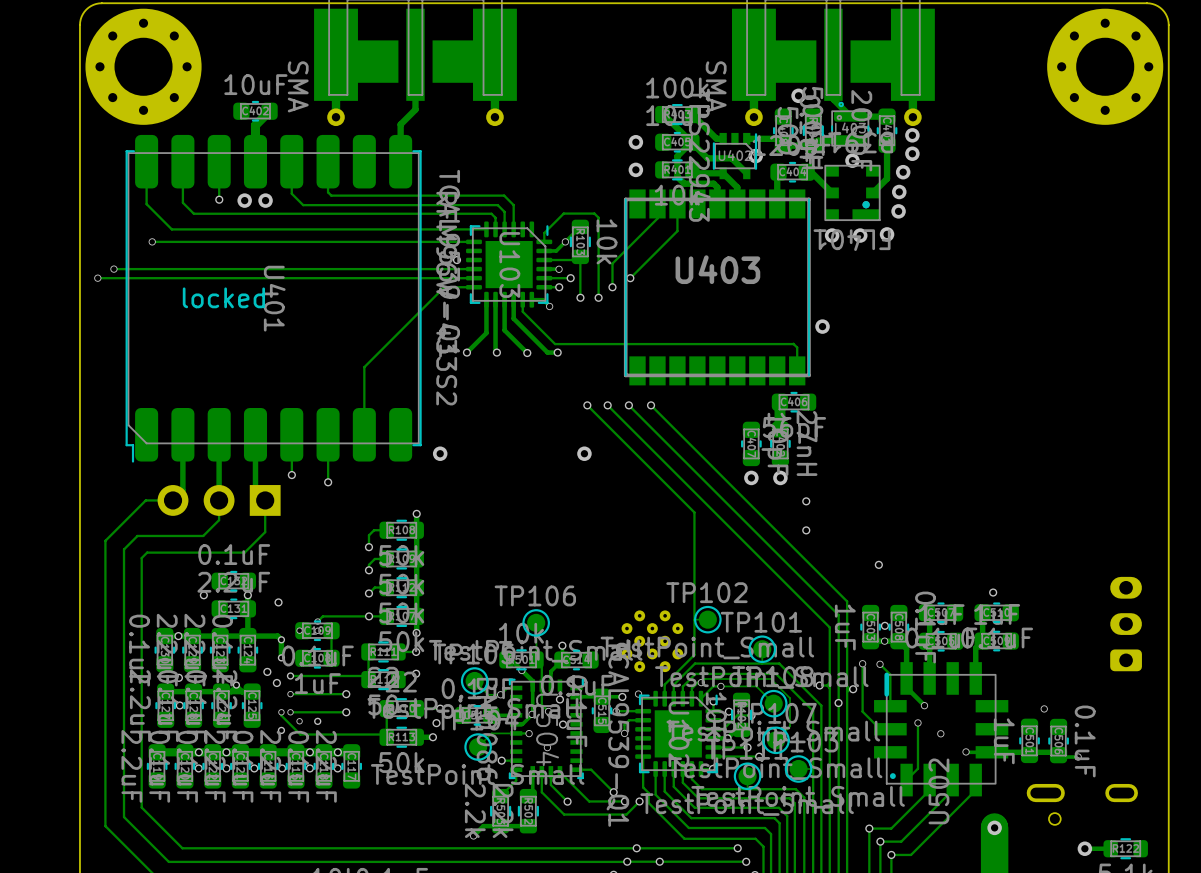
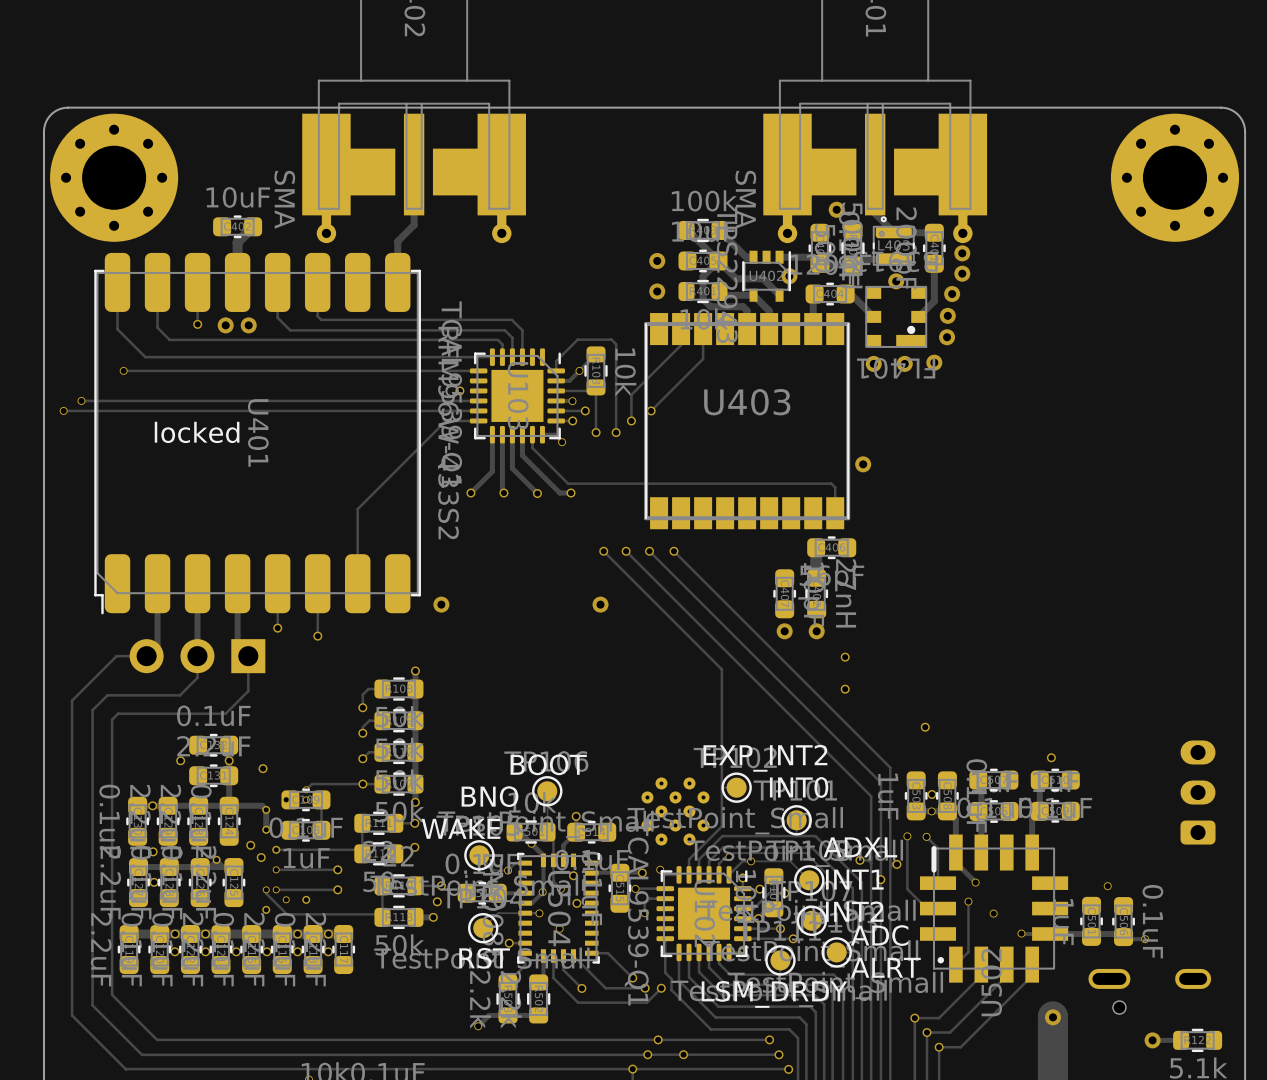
text: none -> EXP_INT2 (765, 758)
text: none -> BOOT (548, 764)
text: none -> INT0 (799, 787)
text: none -> BNO (490, 796)
text: none -> WAKE (461, 828)
text: none -> ADXL (860, 847)
text: none -> INT1 (854, 879)
text: none -> INT2 (854, 911)
text: none -> ADC (879, 935)
text: none -> RST (484, 958)
text: none -> ALRT (885, 967)
text: none -> LSM_DRDY (774, 994)

